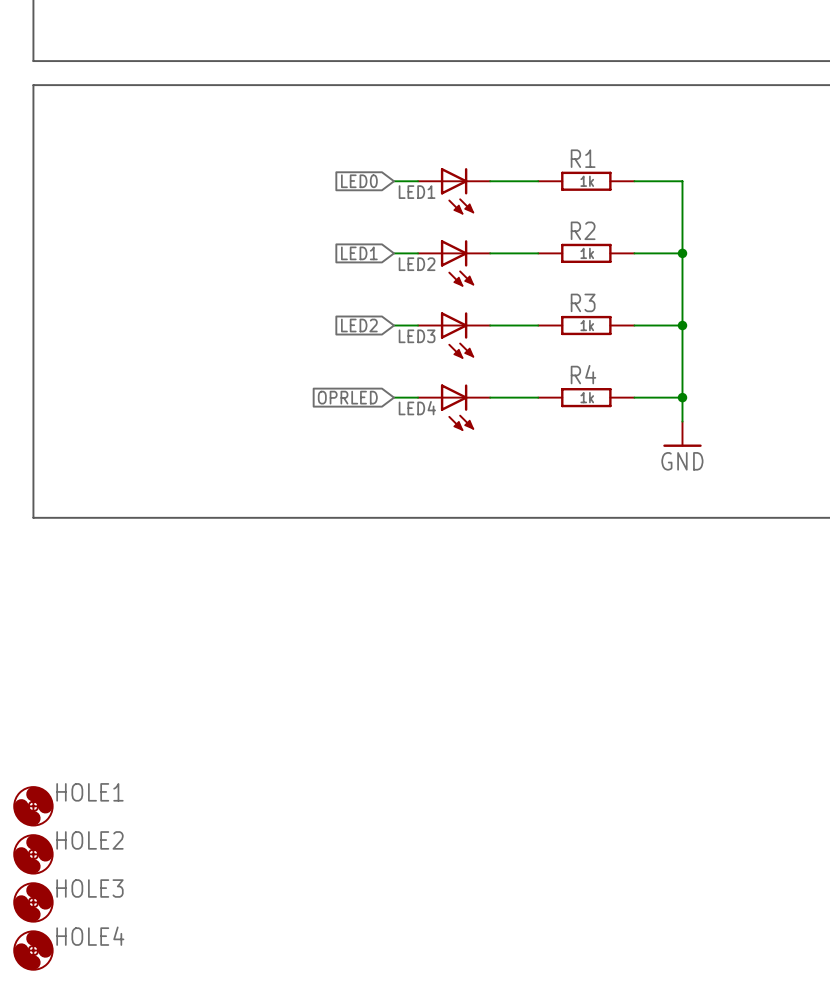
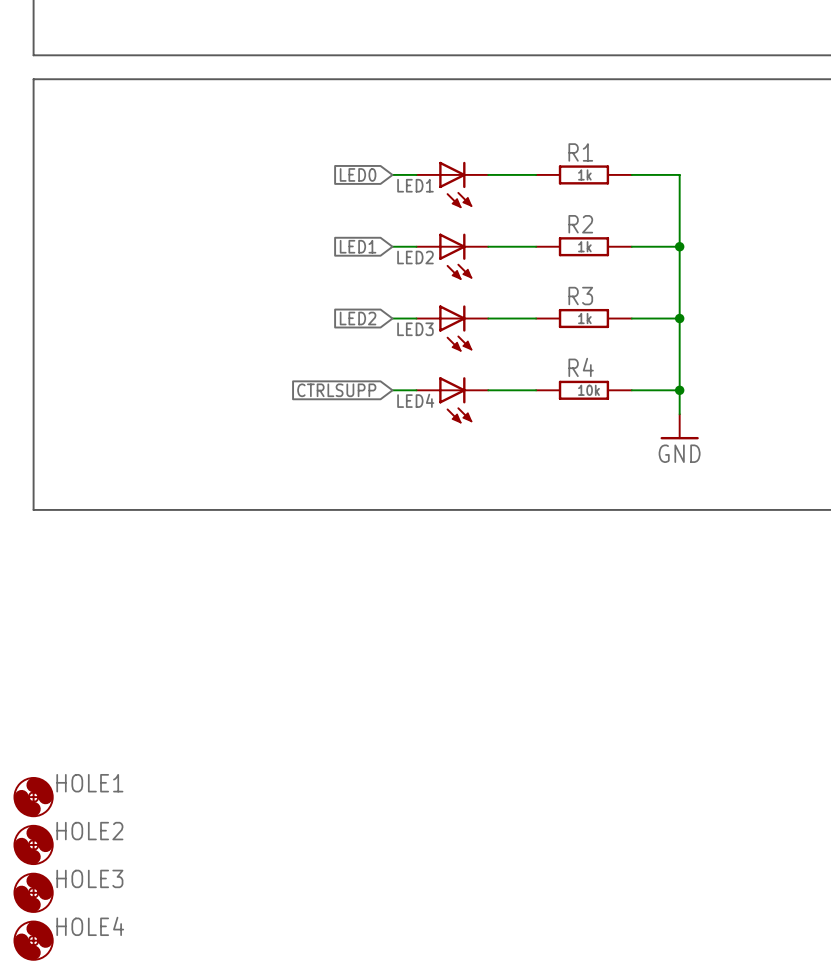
global label: OPRLED (347, 397) -> CTRLSUPP (336, 390)
R4 value: 1k (587, 397) -> 10k (588, 390)

